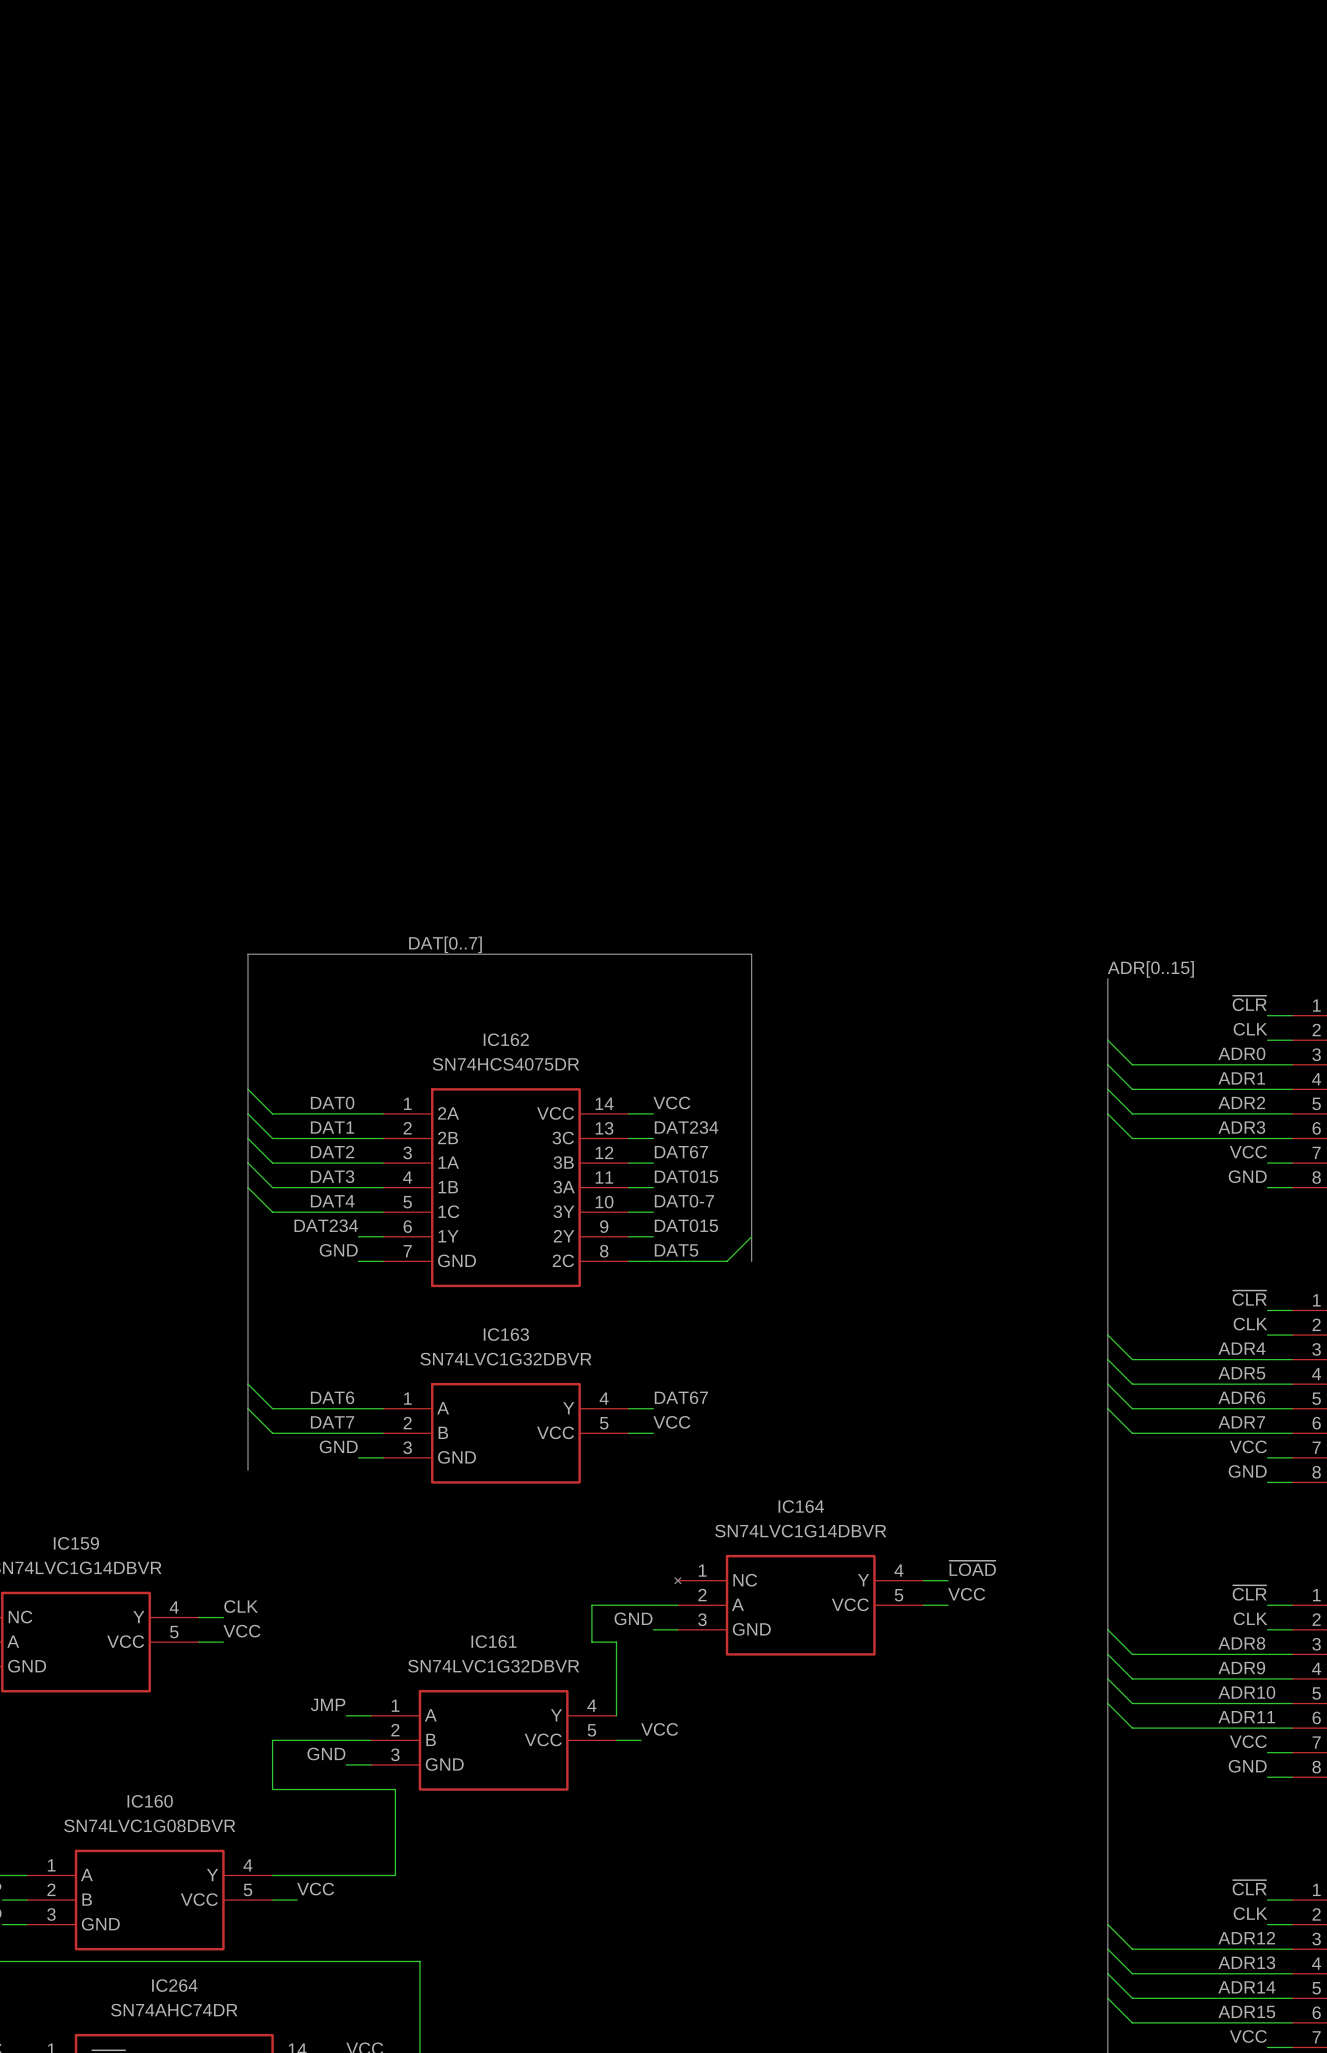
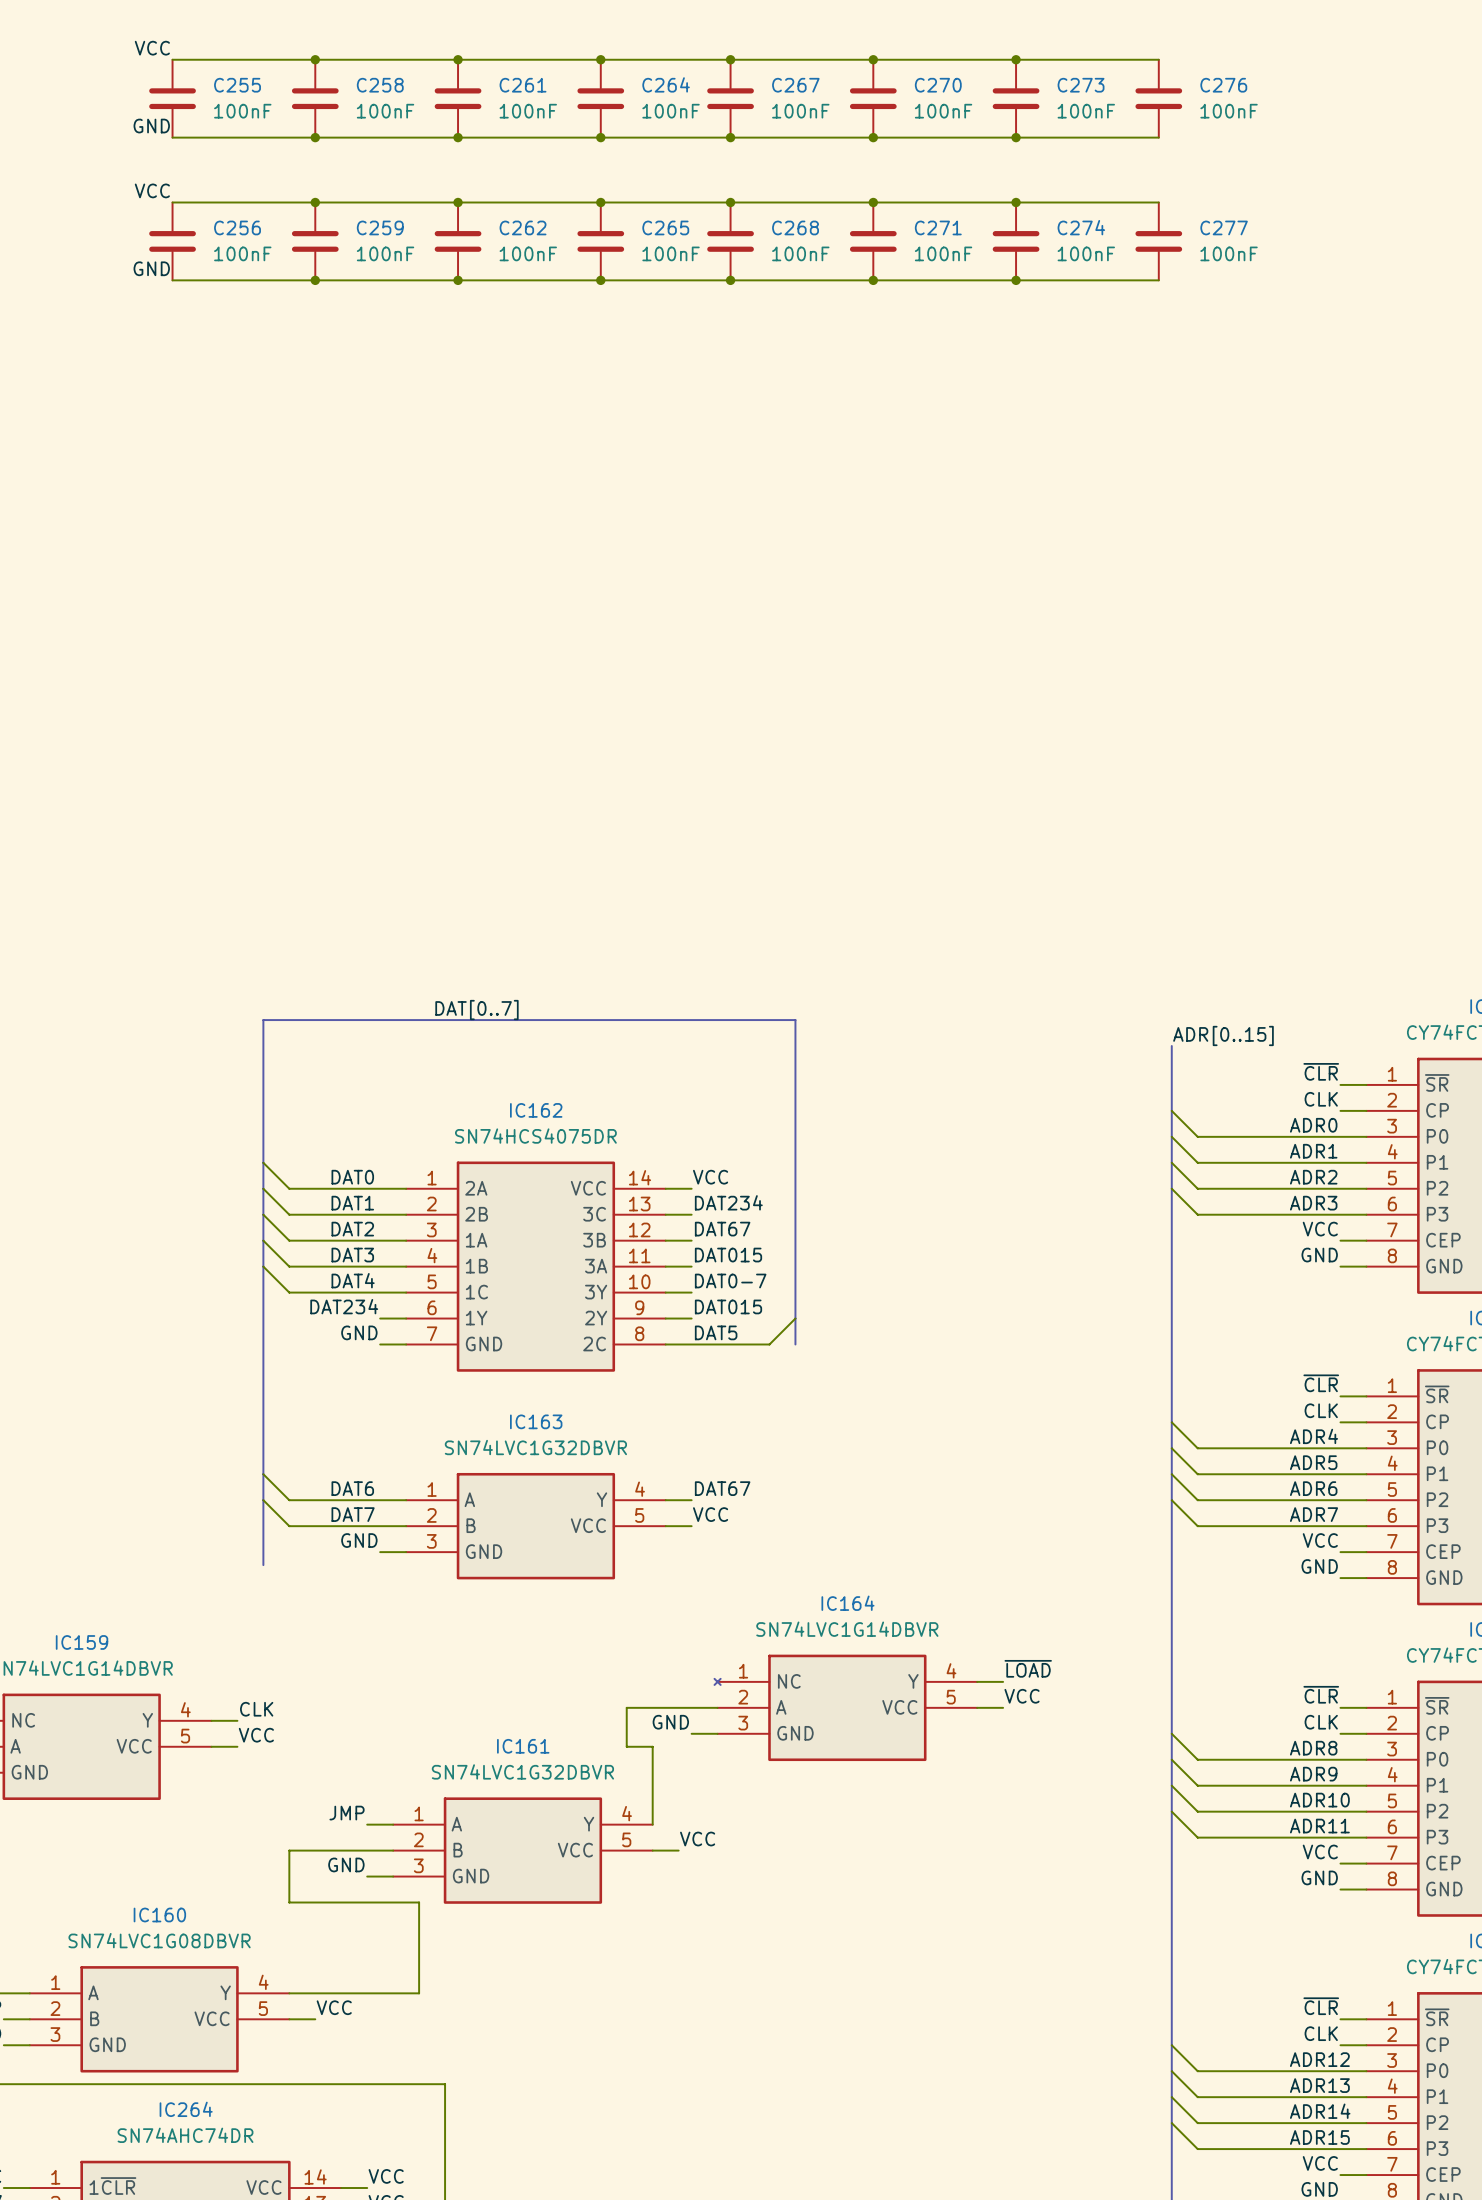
label: none -> VCC (152, 48)
wire: none -> (172, 59) (1158, 59)
junction: none -> (315, 59)
junction: none -> (458, 59)
junction: none -> (600, 59)
junction: none -> (730, 59)
junction: none -> (873, 59)
junction: none -> (1016, 59)
C255: none -> 100nF (172, 98)
C258: none -> 100nF (315, 98)
C261: none -> 100nF (458, 98)
C264: none -> 100nF (600, 98)
C267: none -> 100nF (730, 98)
C270: none -> 100nF (873, 98)
C273: none -> 100nF (1016, 98)
C276: none -> 100nF (1158, 98)
label: none -> GND (151, 126)
wire: none -> (172, 137) (1158, 137)
junction: none -> (315, 137)
junction: none -> (458, 137)
junction: none -> (600, 137)
junction: none -> (730, 137)
junction: none -> (873, 137)
junction: none -> (1016, 137)
label: none -> VCC (152, 190)
wire: none -> (172, 202) (1158, 202)
junction: none -> (315, 202)
junction: none -> (458, 202)
junction: none -> (600, 202)
junction: none -> (730, 202)
junction: none -> (873, 202)
junction: none -> (1016, 202)
C256: none -> 100nF (172, 241)
C259: none -> 100nF (315, 241)
C262: none -> 100nF (458, 241)
C265: none -> 100nF (600, 241)
C268: none -> 100nF (730, 241)
C271: none -> 100nF (873, 241)
C274: none -> 100nF (1016, 241)
C277: none -> 100nF (1158, 241)
label: none -> GND (151, 268)
wire: none -> (172, 280) (1158, 280)
junction: none -> (315, 280)
junction: none -> (458, 280)
junction: none -> (600, 280)
junction: none -> (730, 280)
junction: none -> (873, 280)
junction: none -> (1016, 280)

